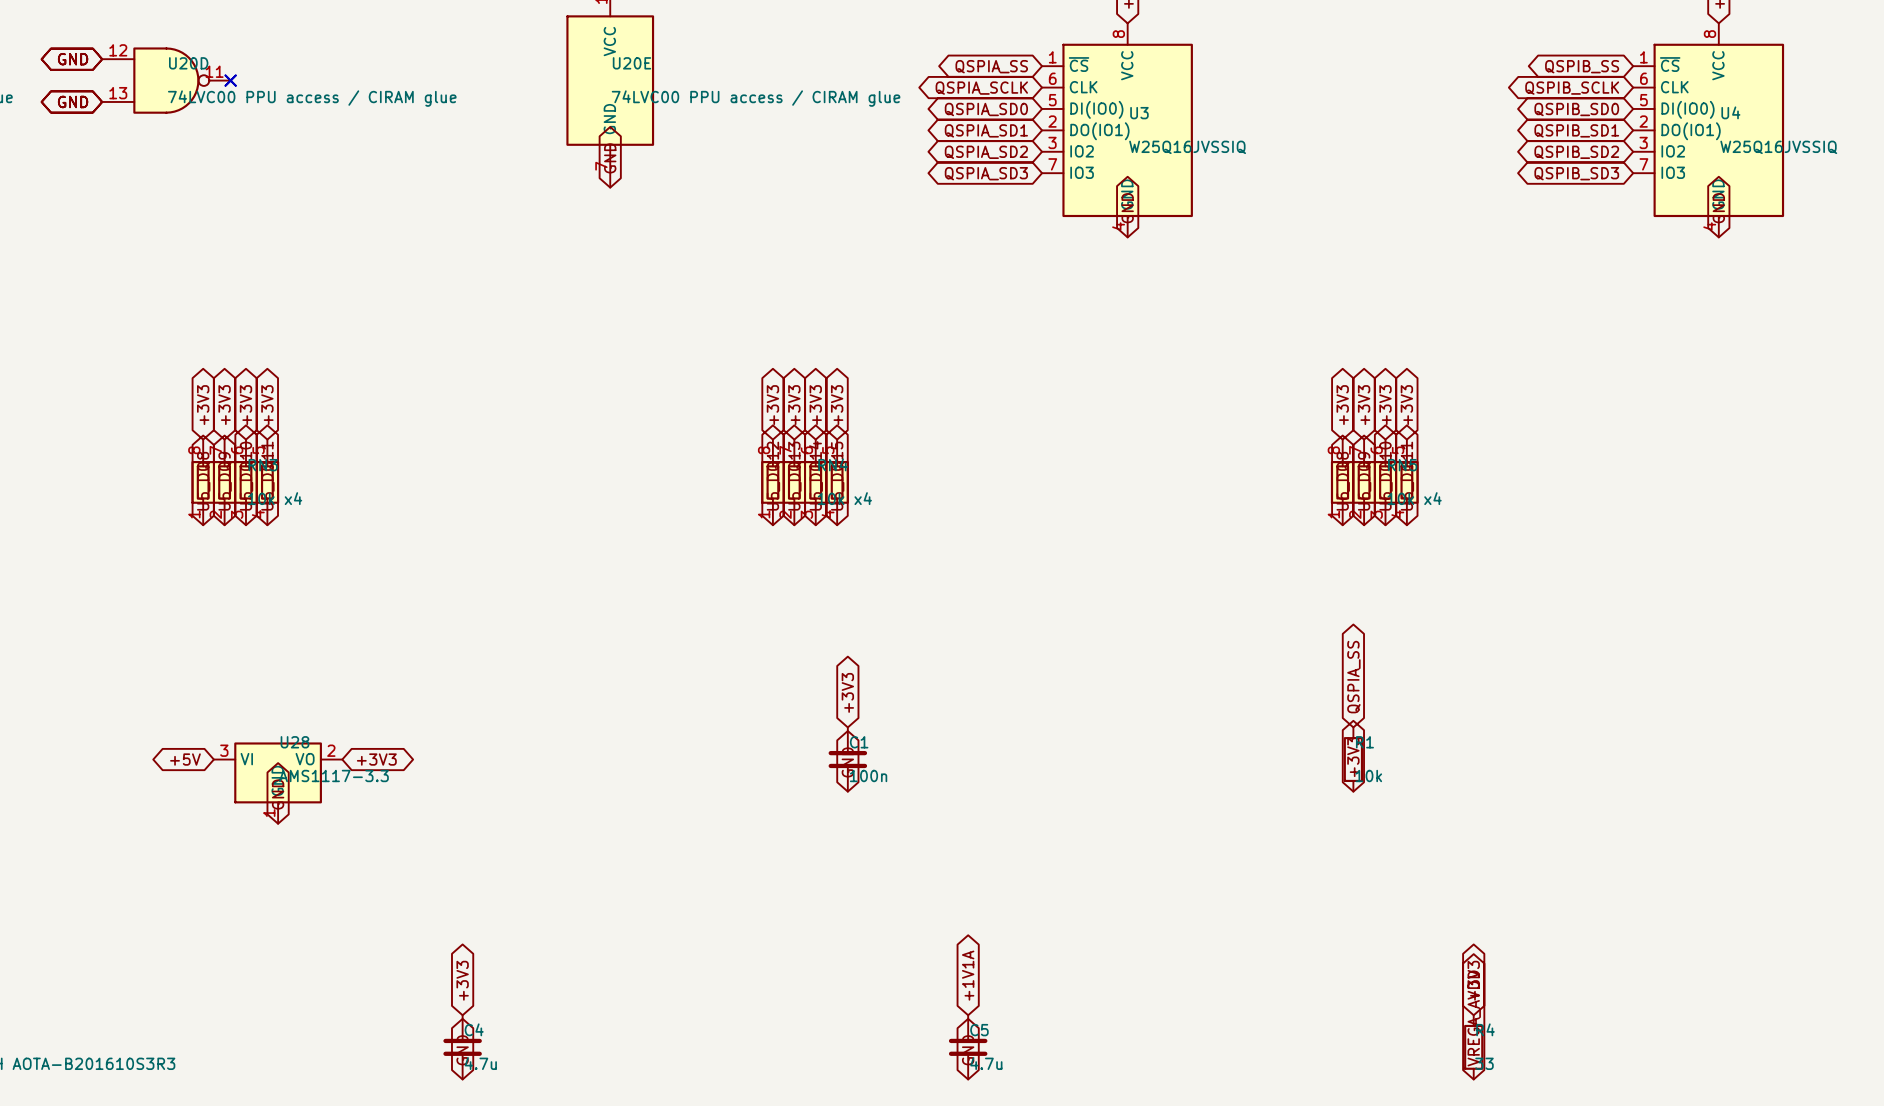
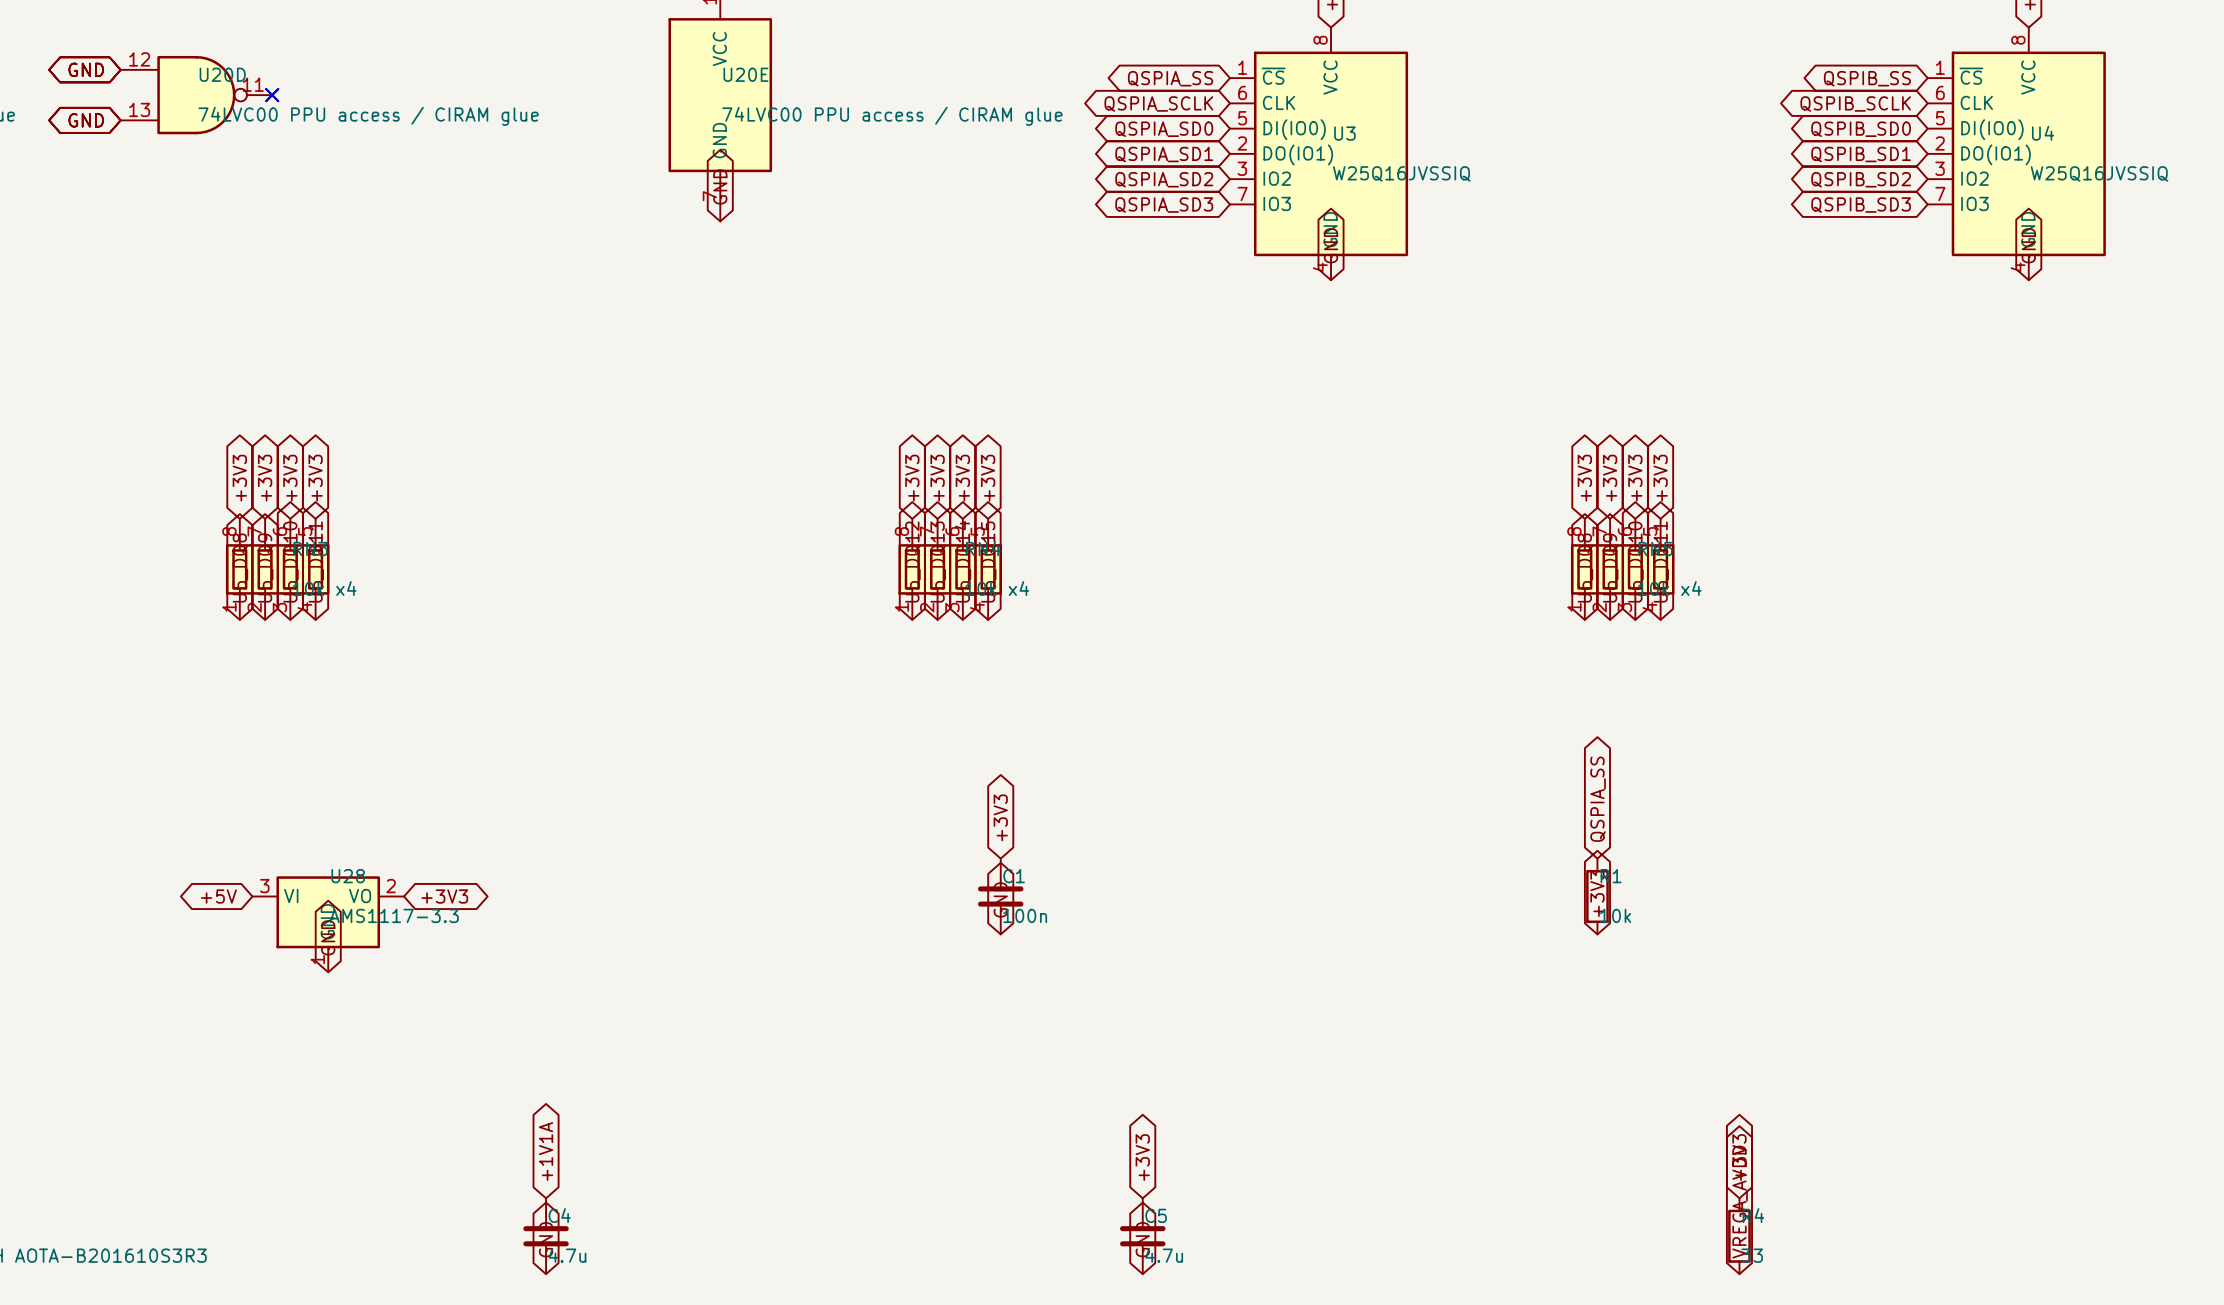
global label: +1V1A (968, 975) -> +3V3 (1142, 1157)
global label: +3V3 (462, 980) -> +1V1A (546, 1151)

